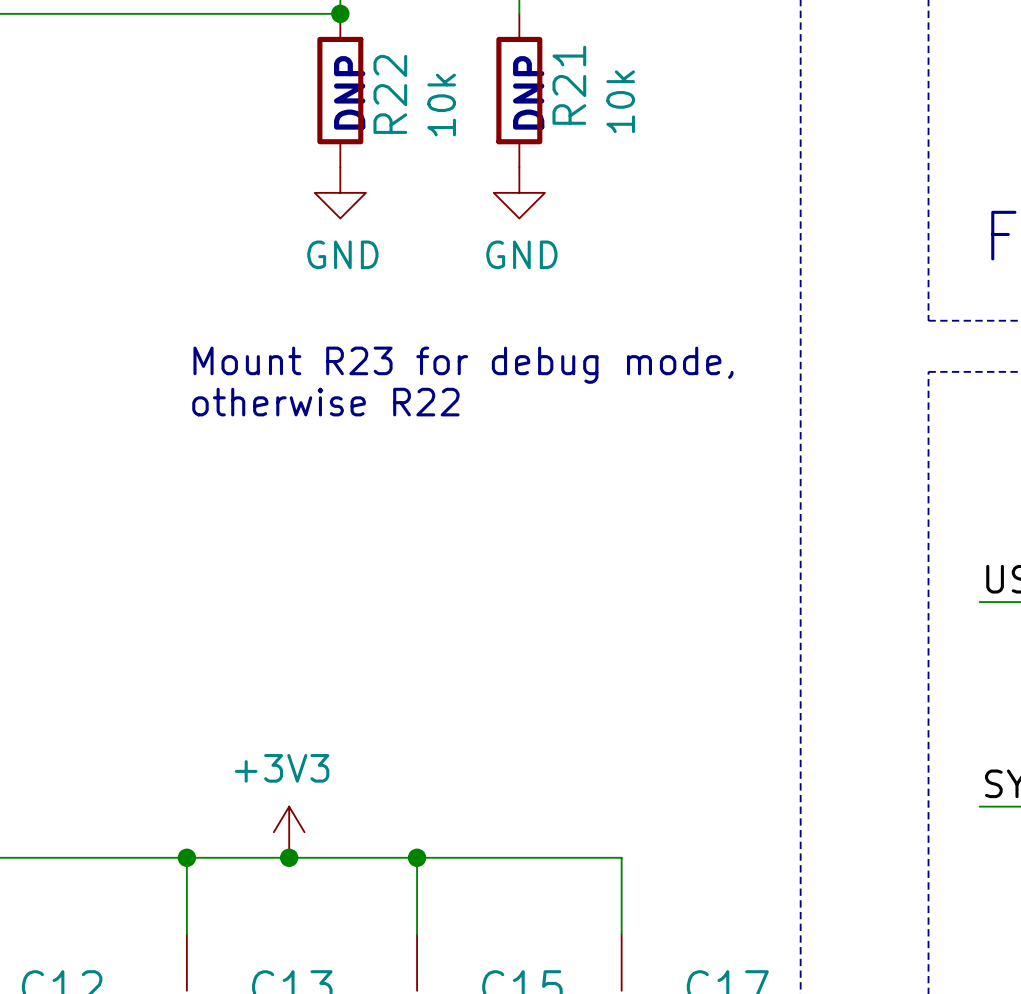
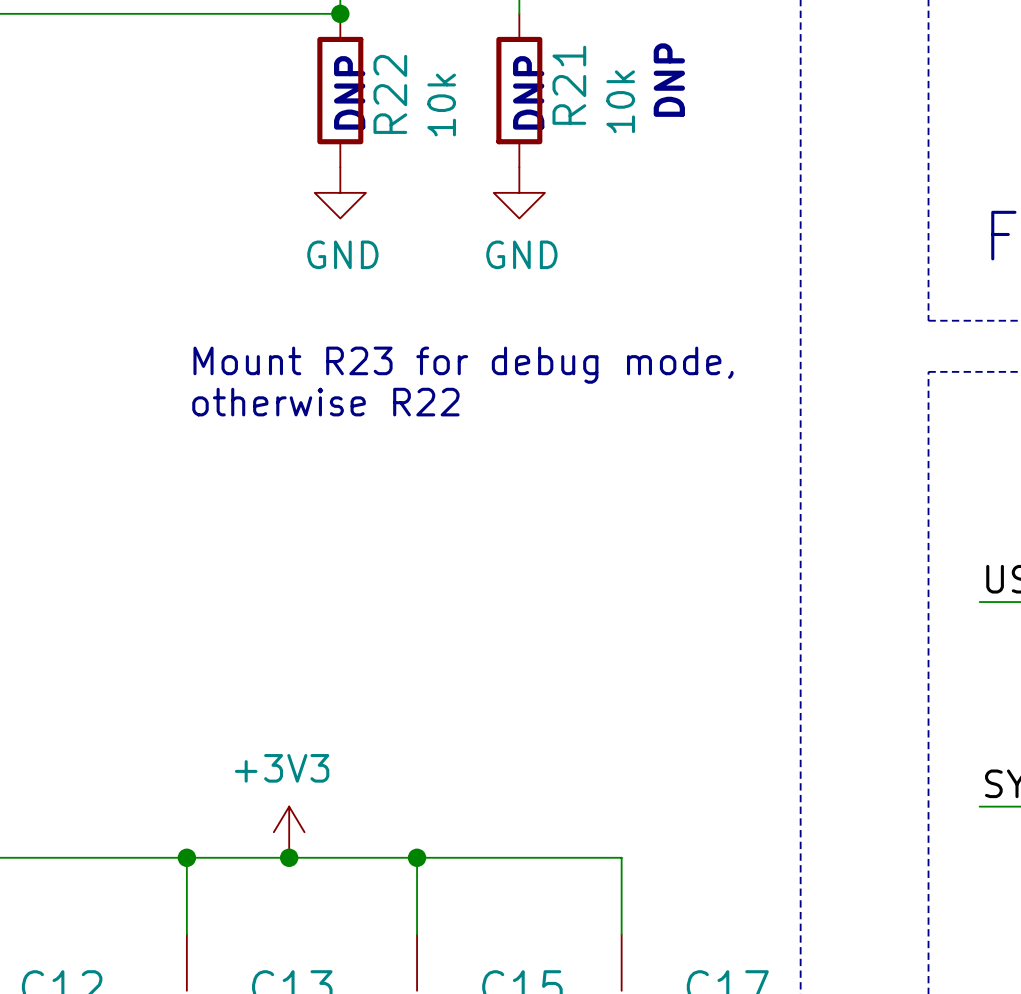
text: none -> DNP (669, 80)

